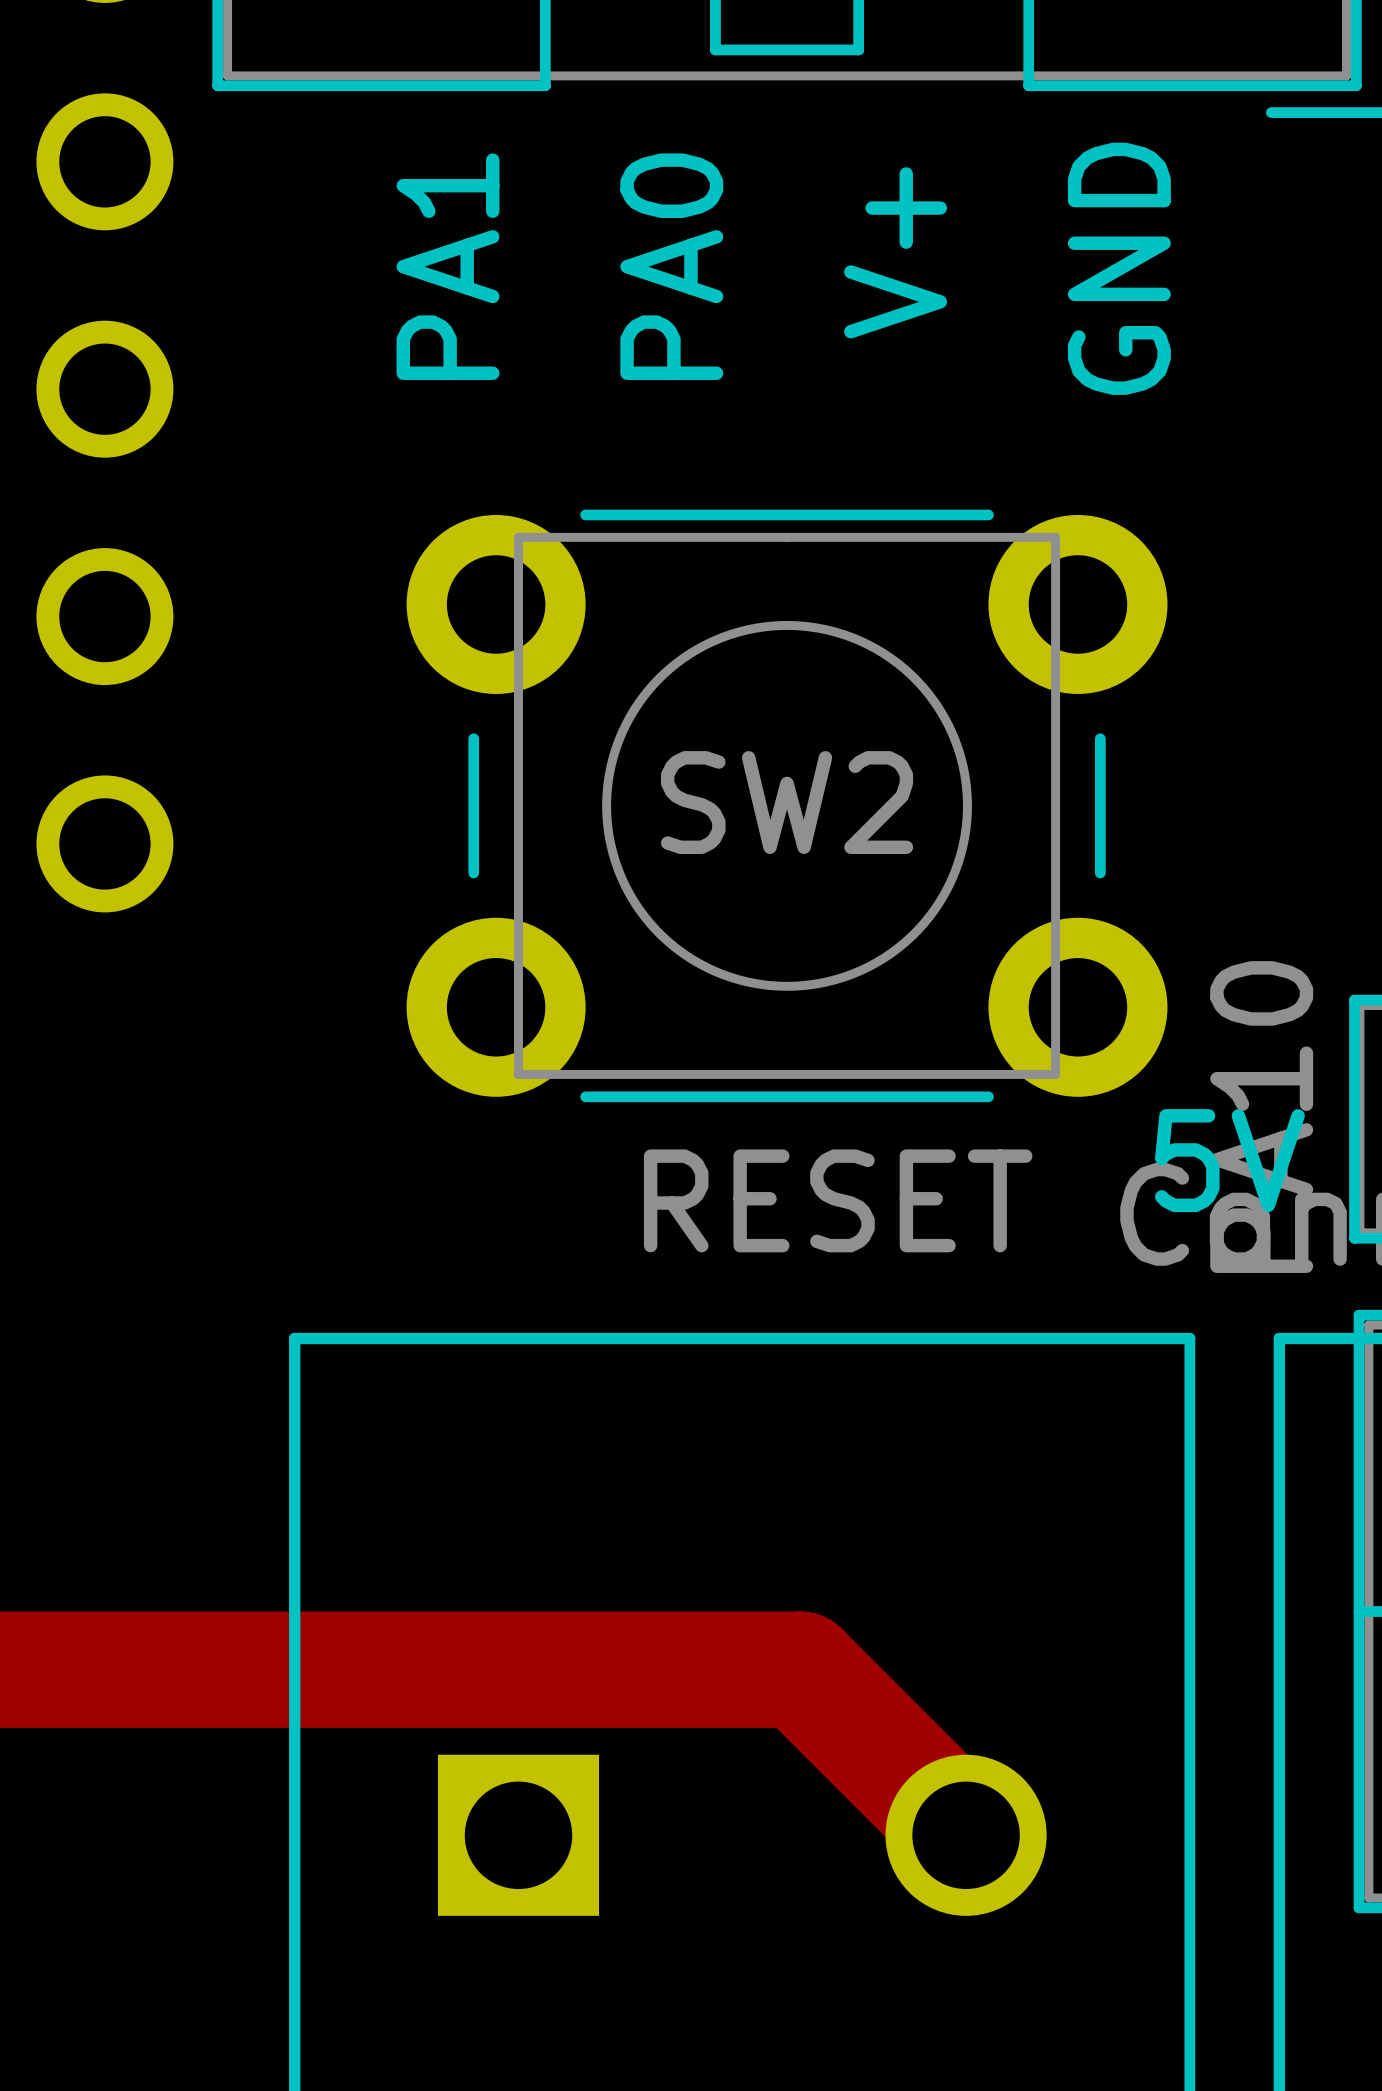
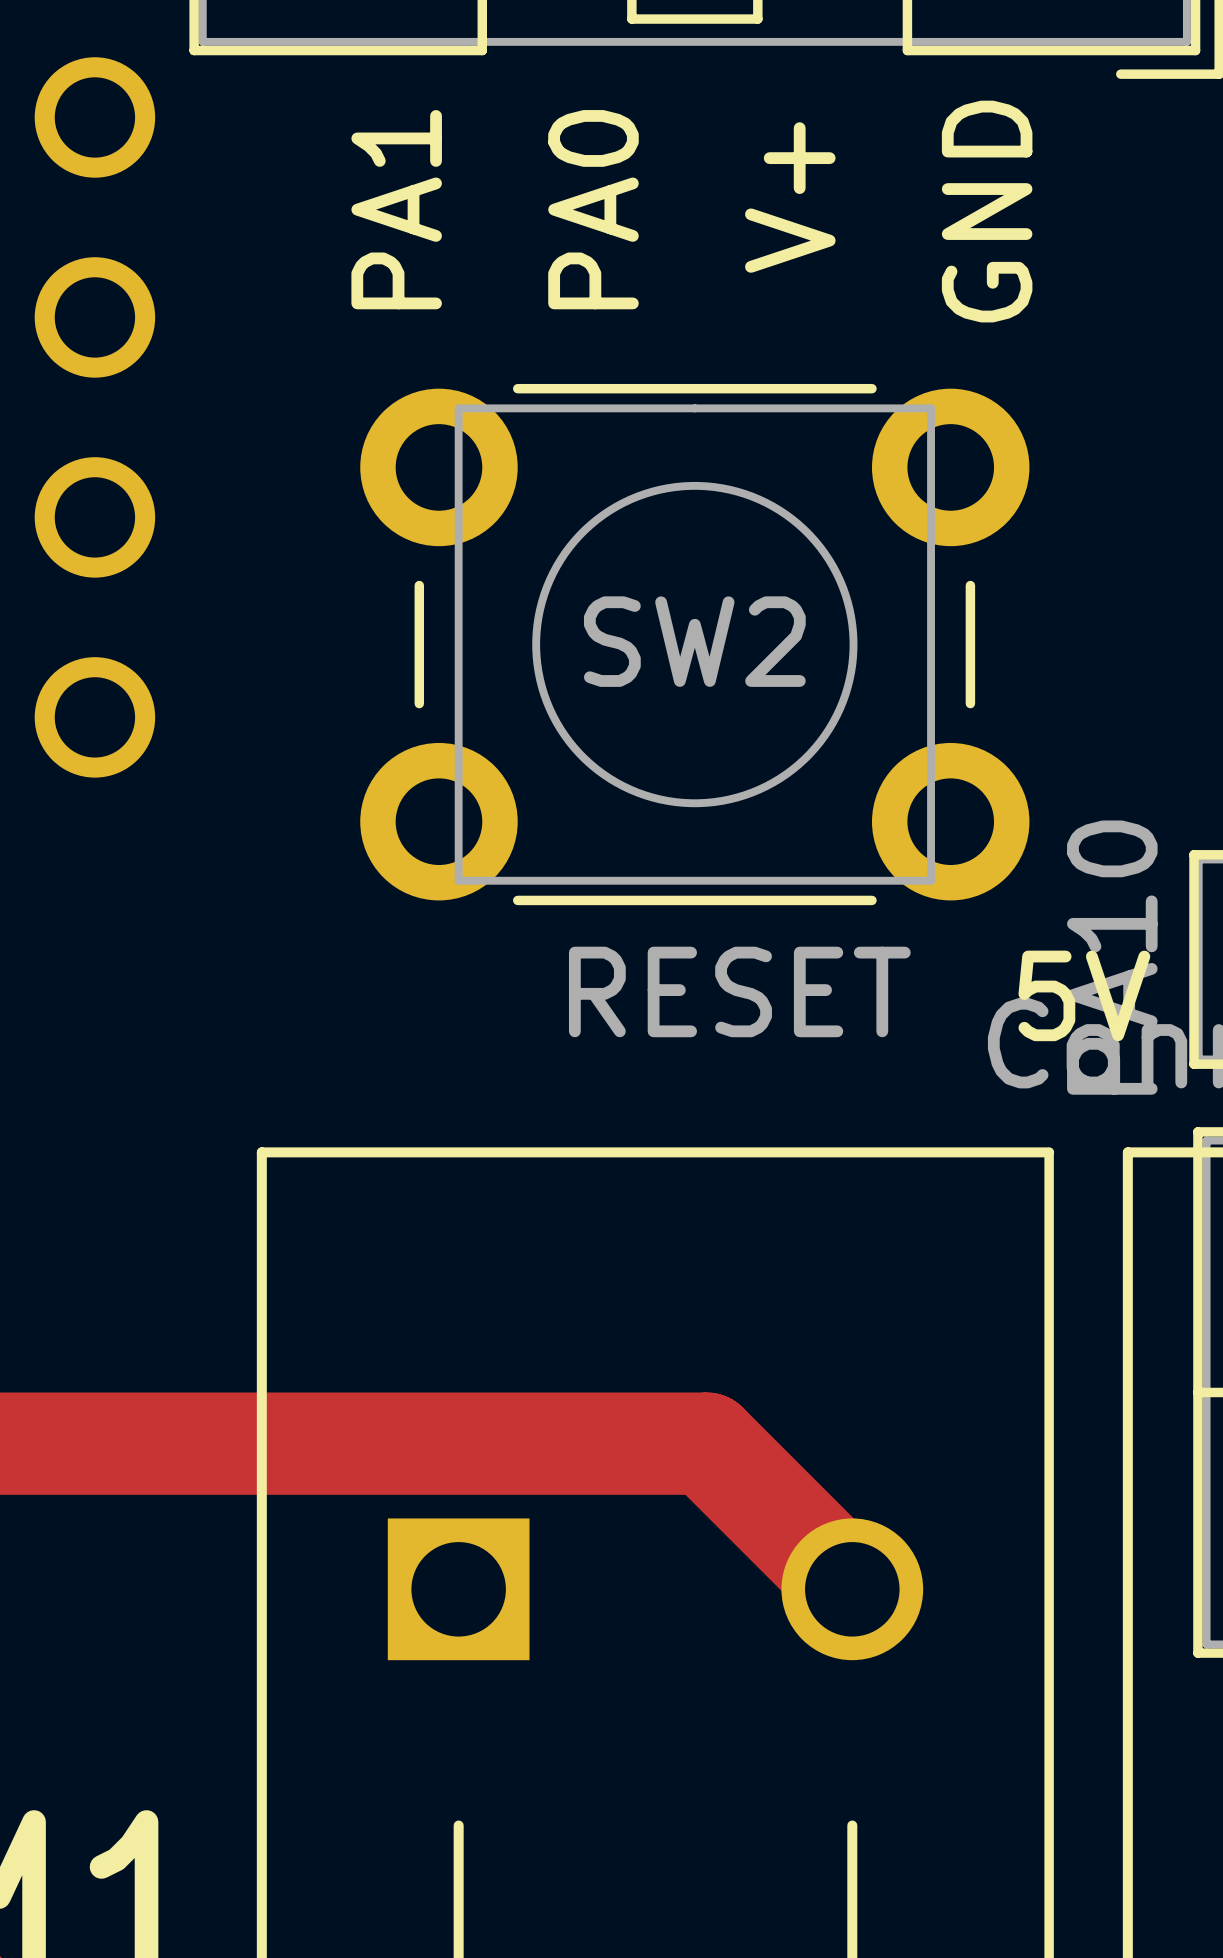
SW2 position: (787, 805) -> (694, 644)

